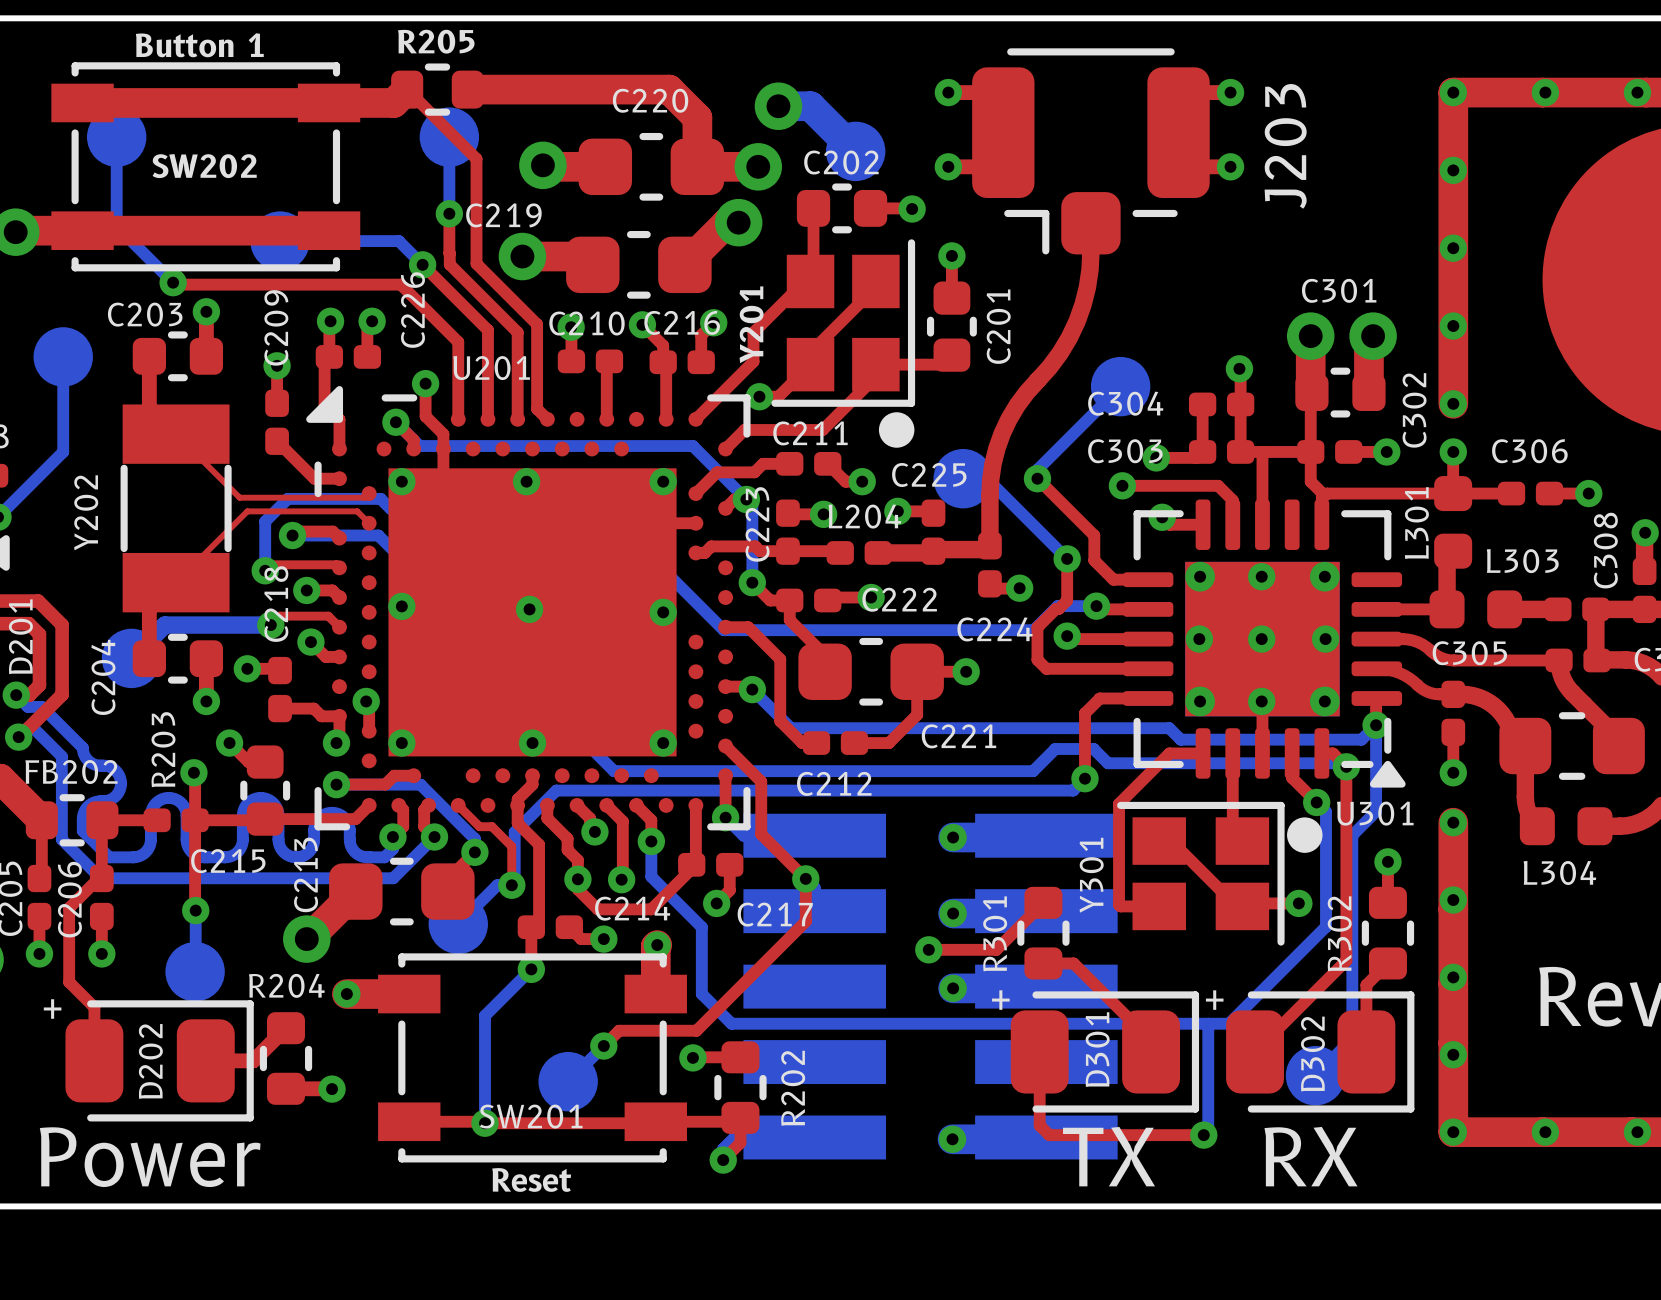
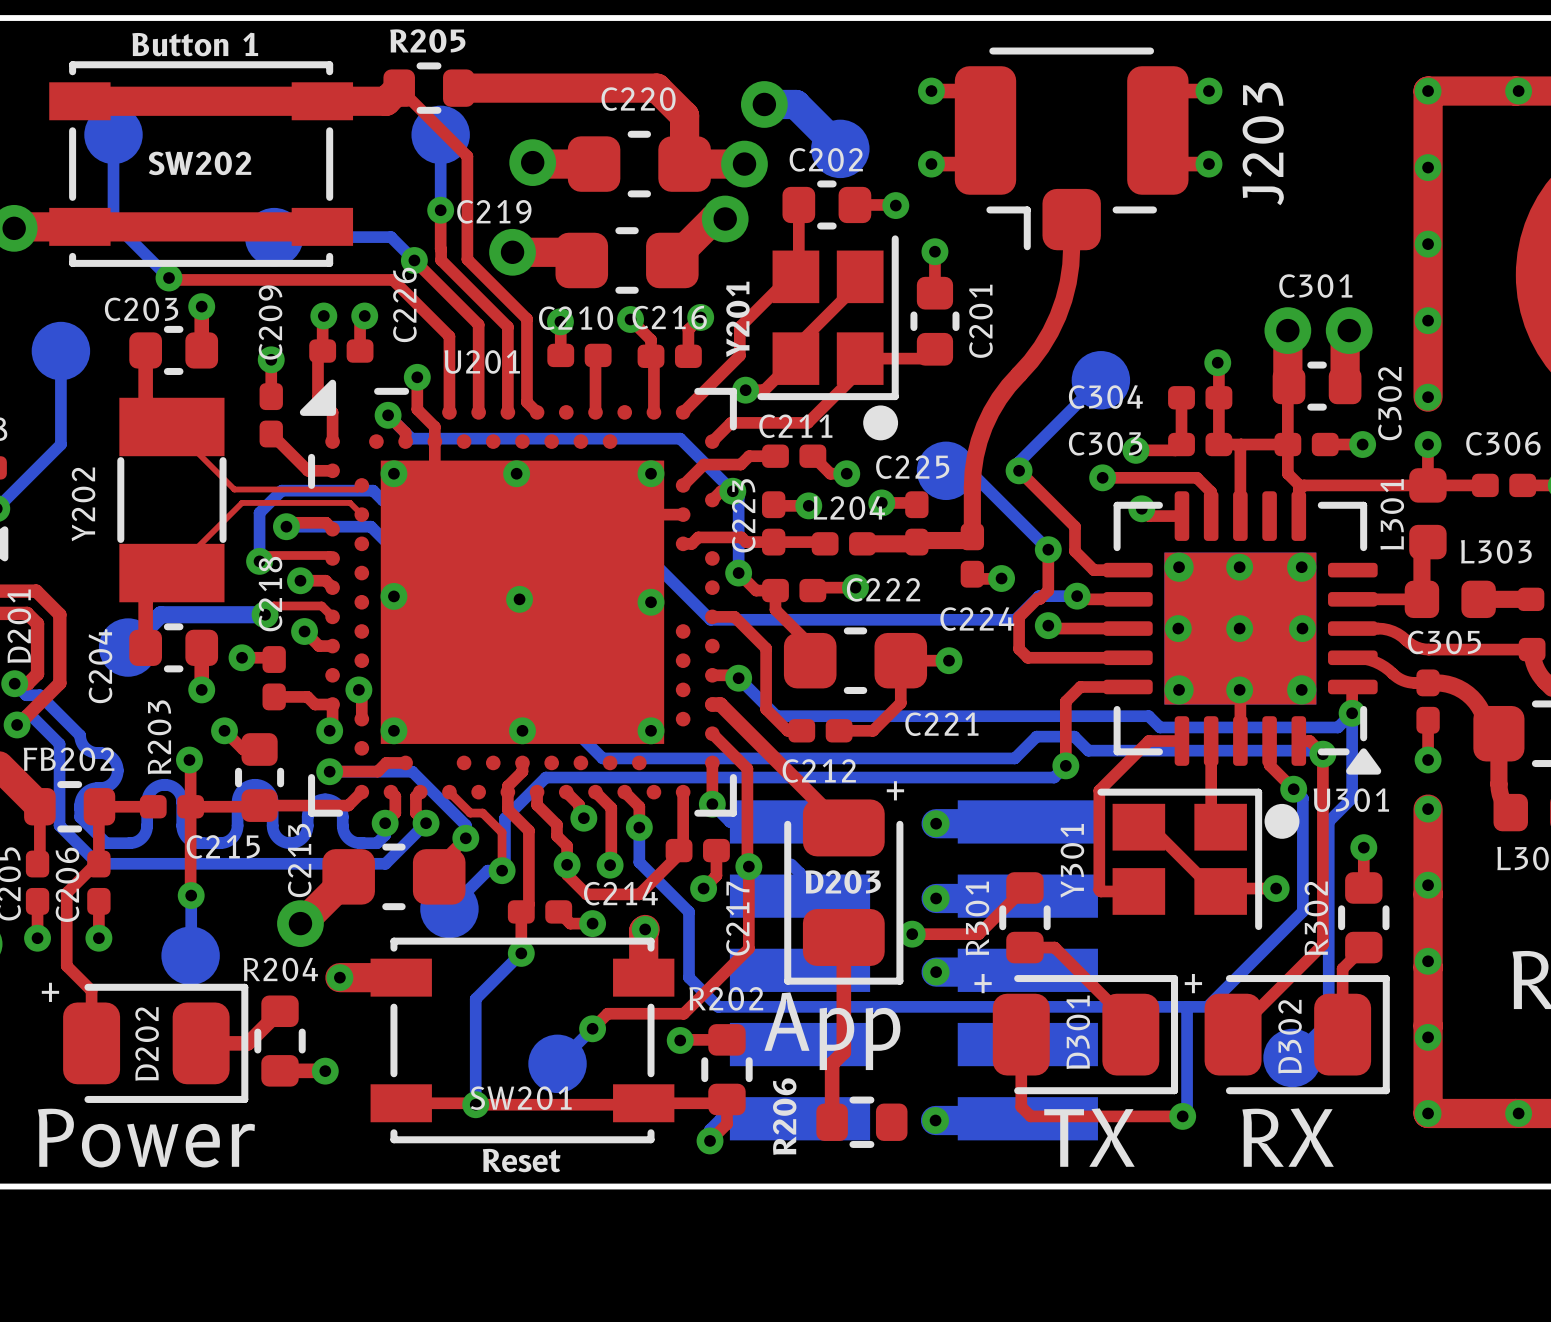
top track: none -> (712, 704) (720, 704) (843, 827)
text: none -> + (895, 790)
top track: (761, 834) (805, 878) (805, 921) (762, 964) -> (747, 820) (748, 948)
via position: (805, 878) -> (748, 866)
D203: none -> (843, 892)
C217 name rotation: 0° (775, 914) -> 90° counterclockwise (737, 918)
top track: none -> (843, 937) (843, 1052) (832, 1063) (832, 1122)
text: none -> App (832, 1031)
R202 name rotation: 0° (793, 1088) -> 90° clockwise (726, 998)
R206: none -> (861, 1122)

